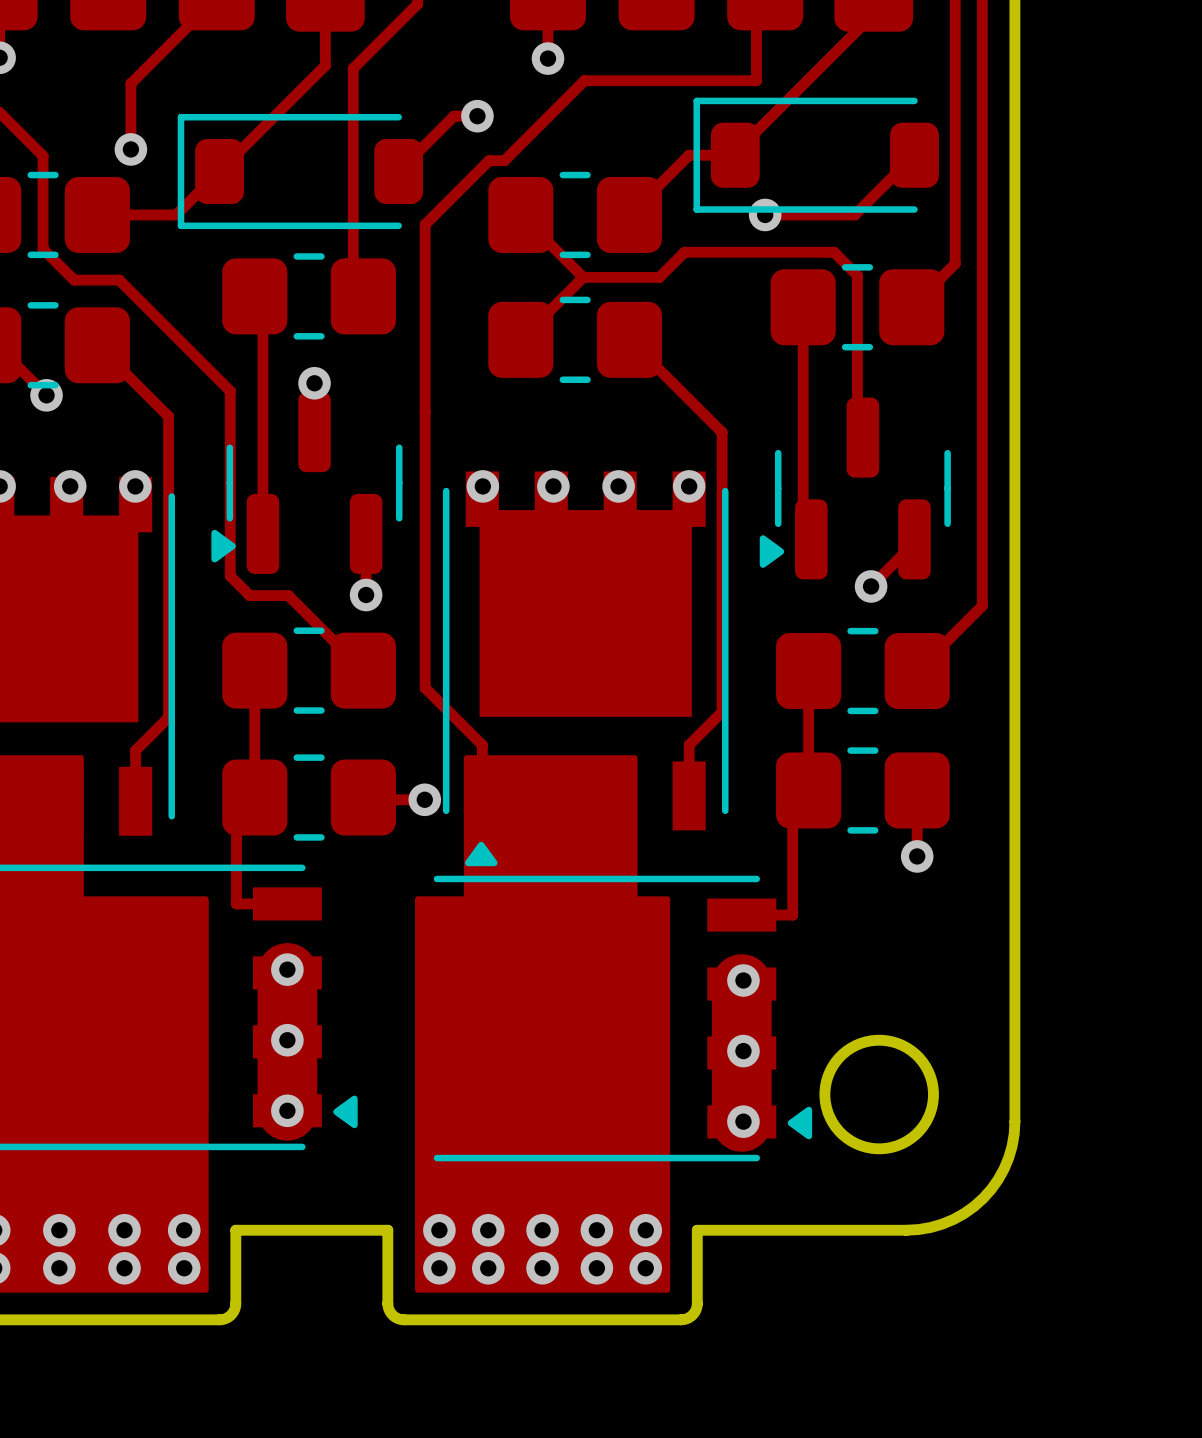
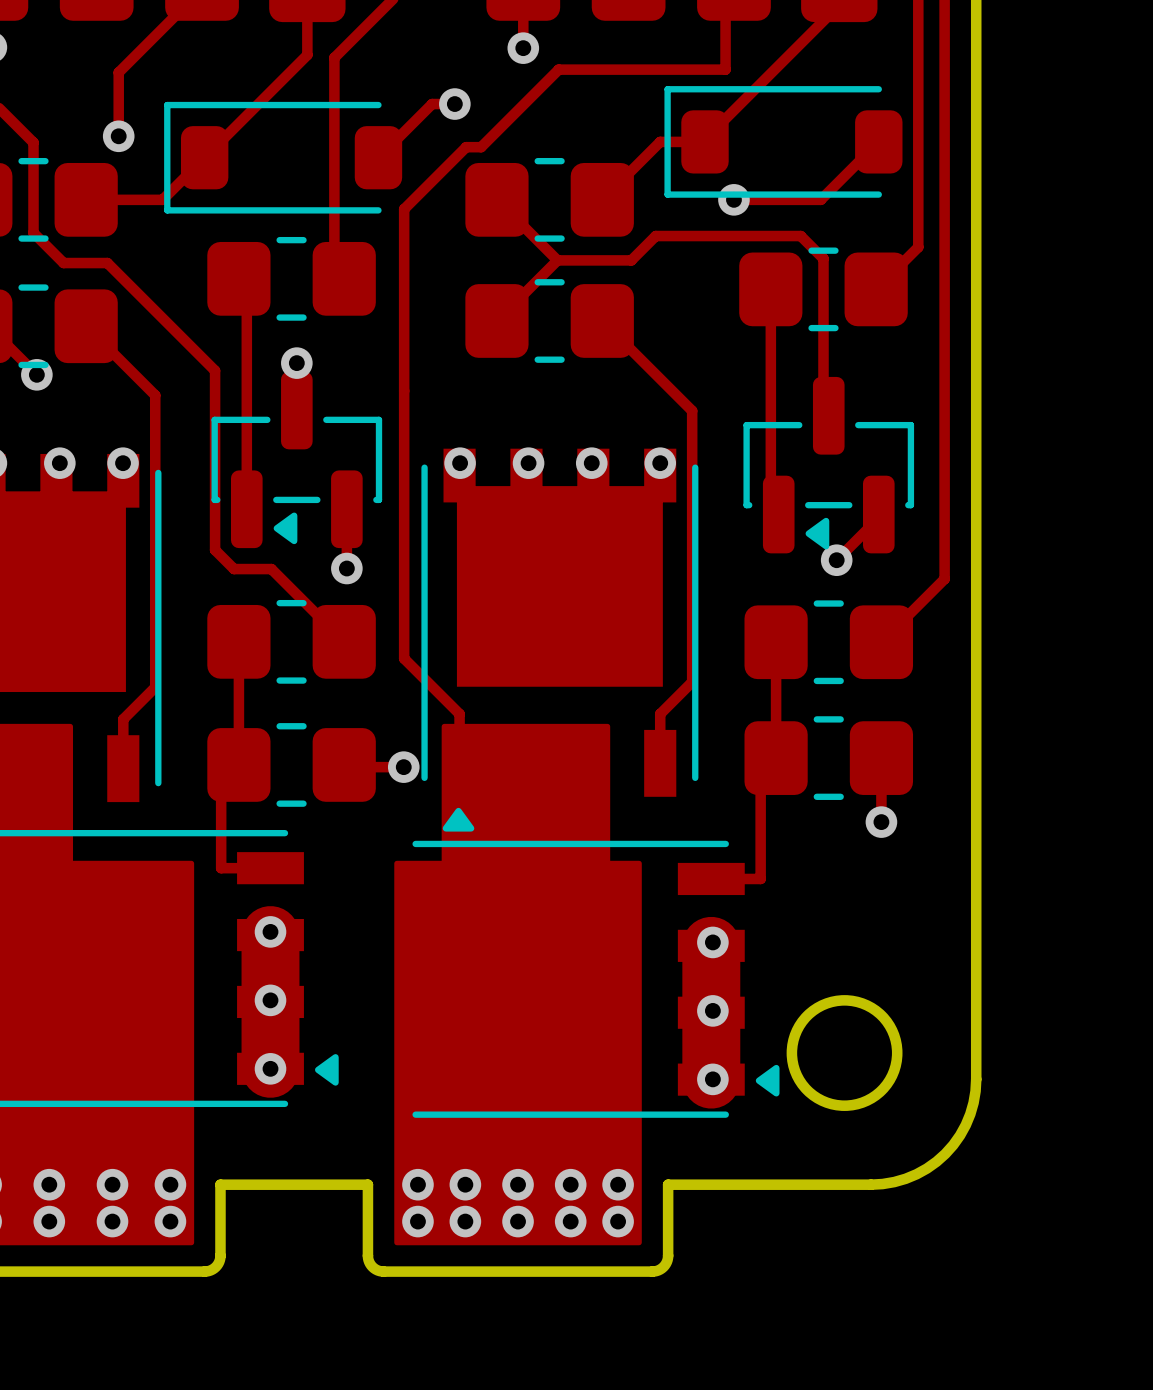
part footprint: [211, 392, 403, 574] -> [211, 371, 383, 549]
part footprint: [759, 397, 951, 580] -> [743, 376, 915, 554]

